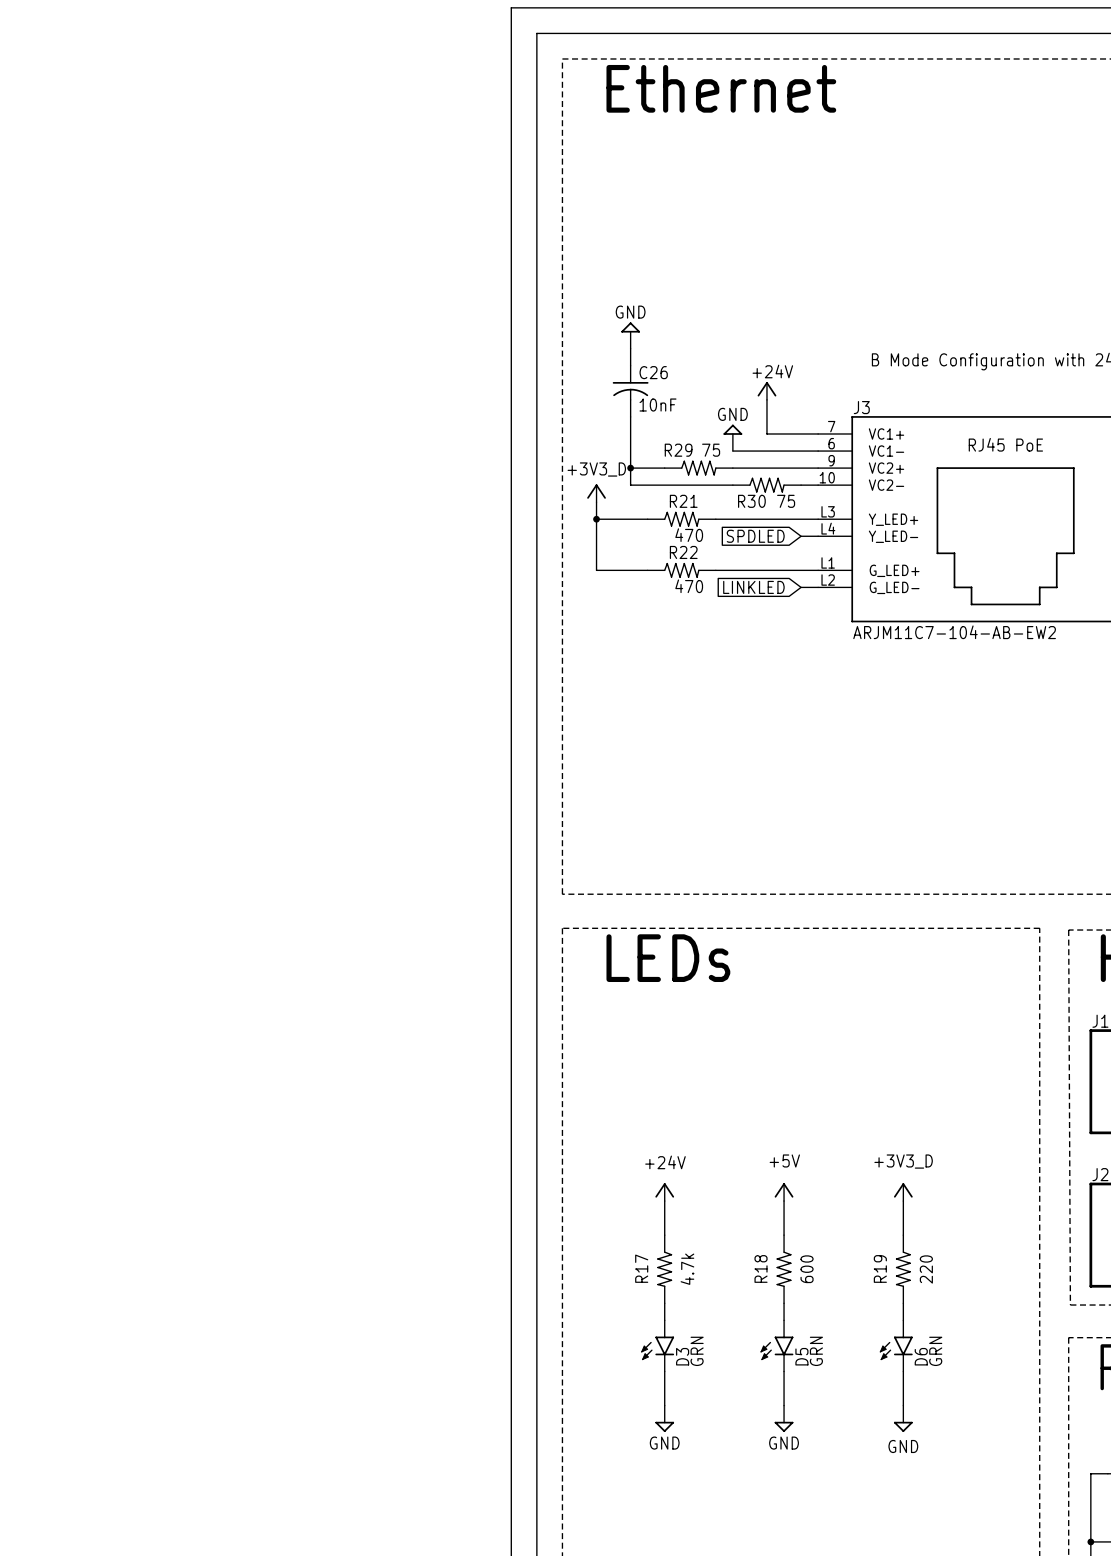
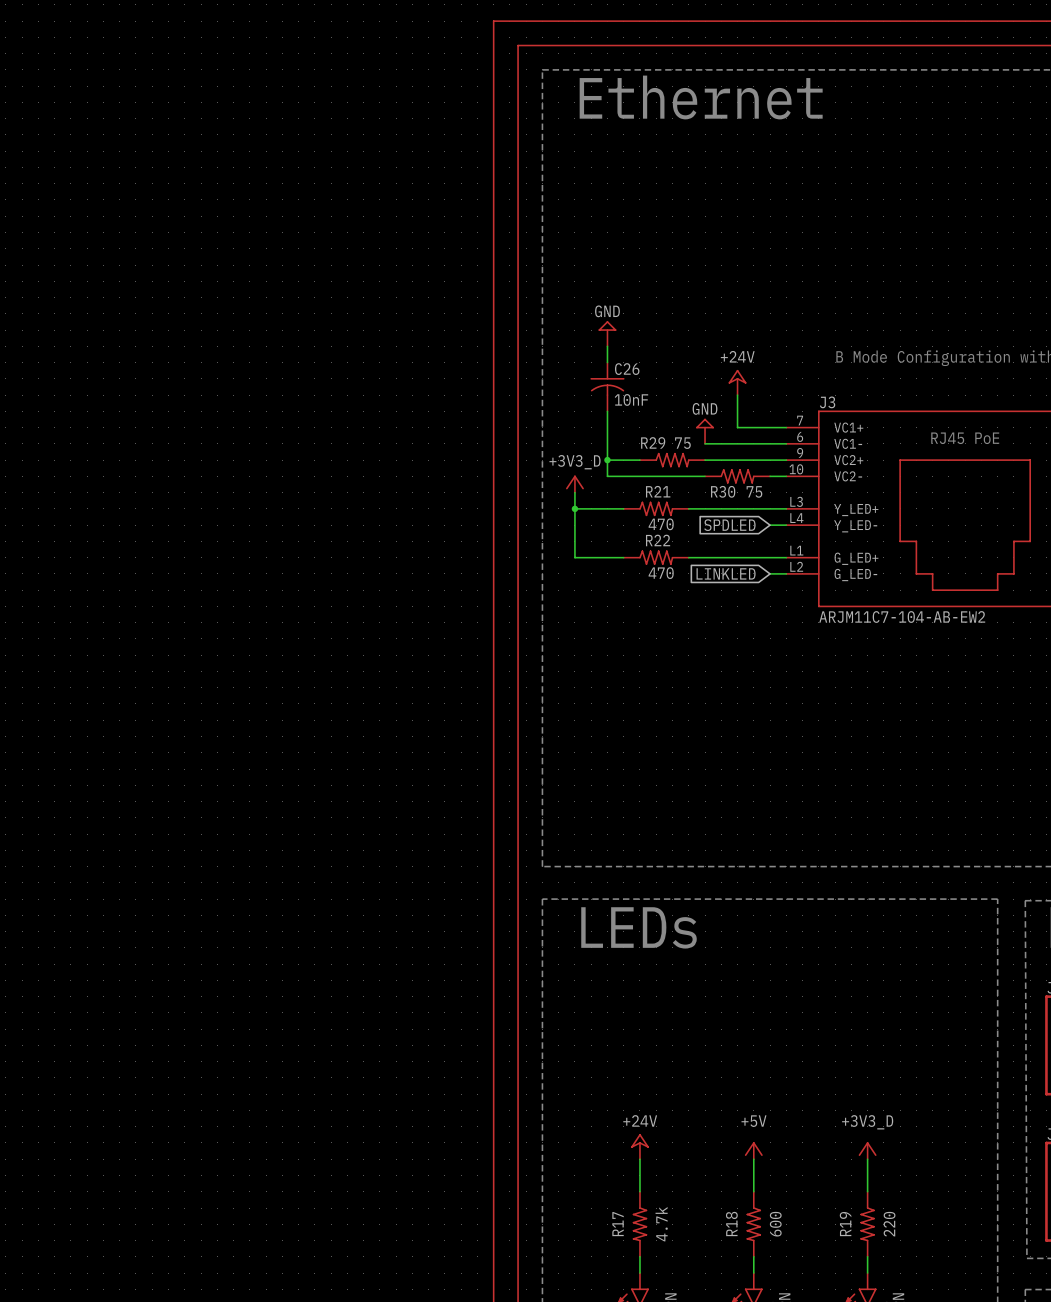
power symbol shape: [757, 382, 777, 400] -> [728, 369, 747, 396]
power symbol shape: [655, 1183, 675, 1202] -> [631, 1134, 649, 1160]

